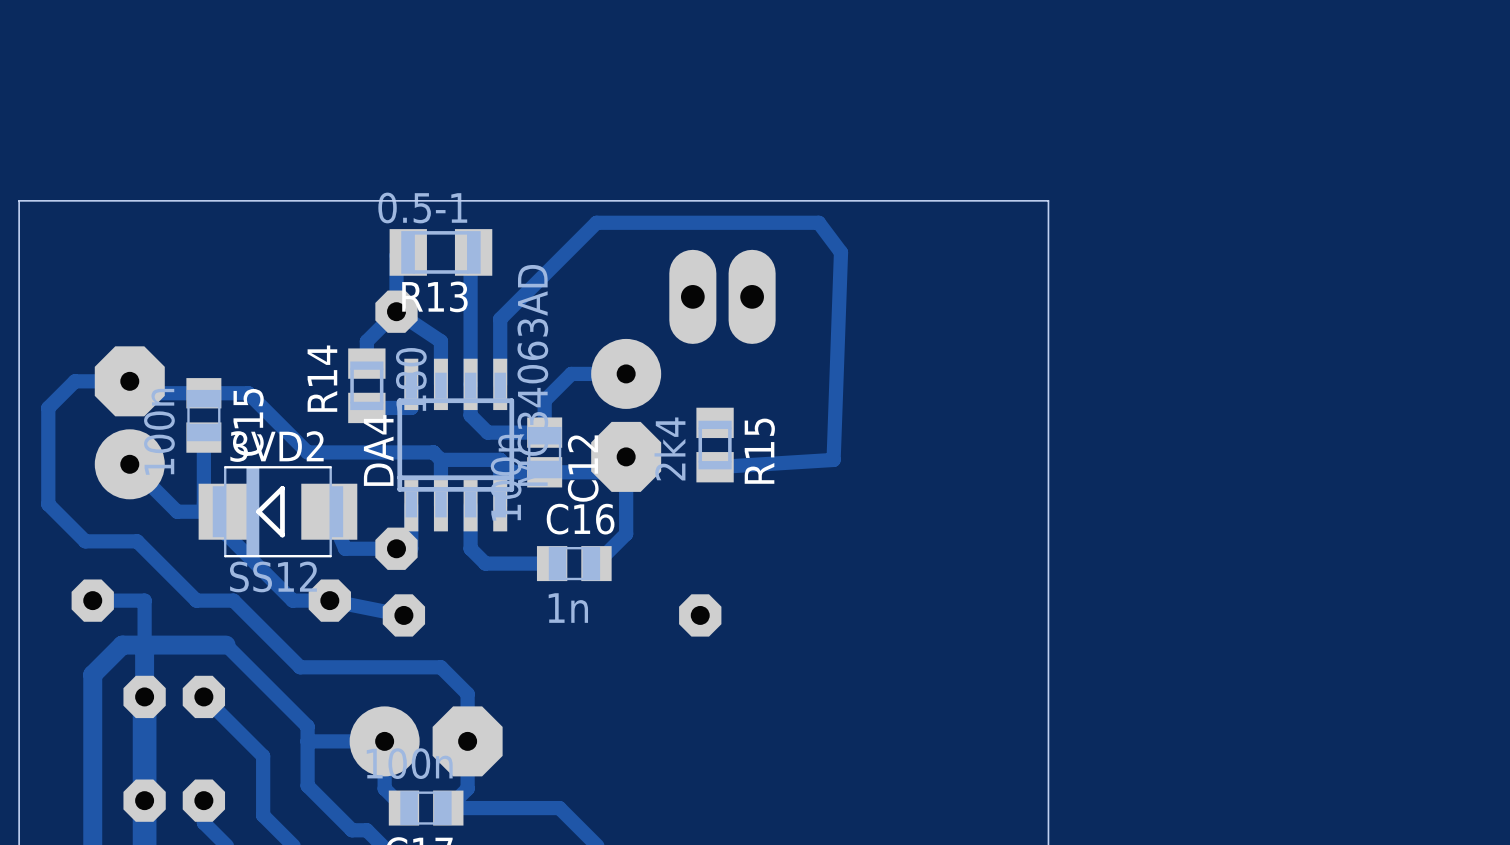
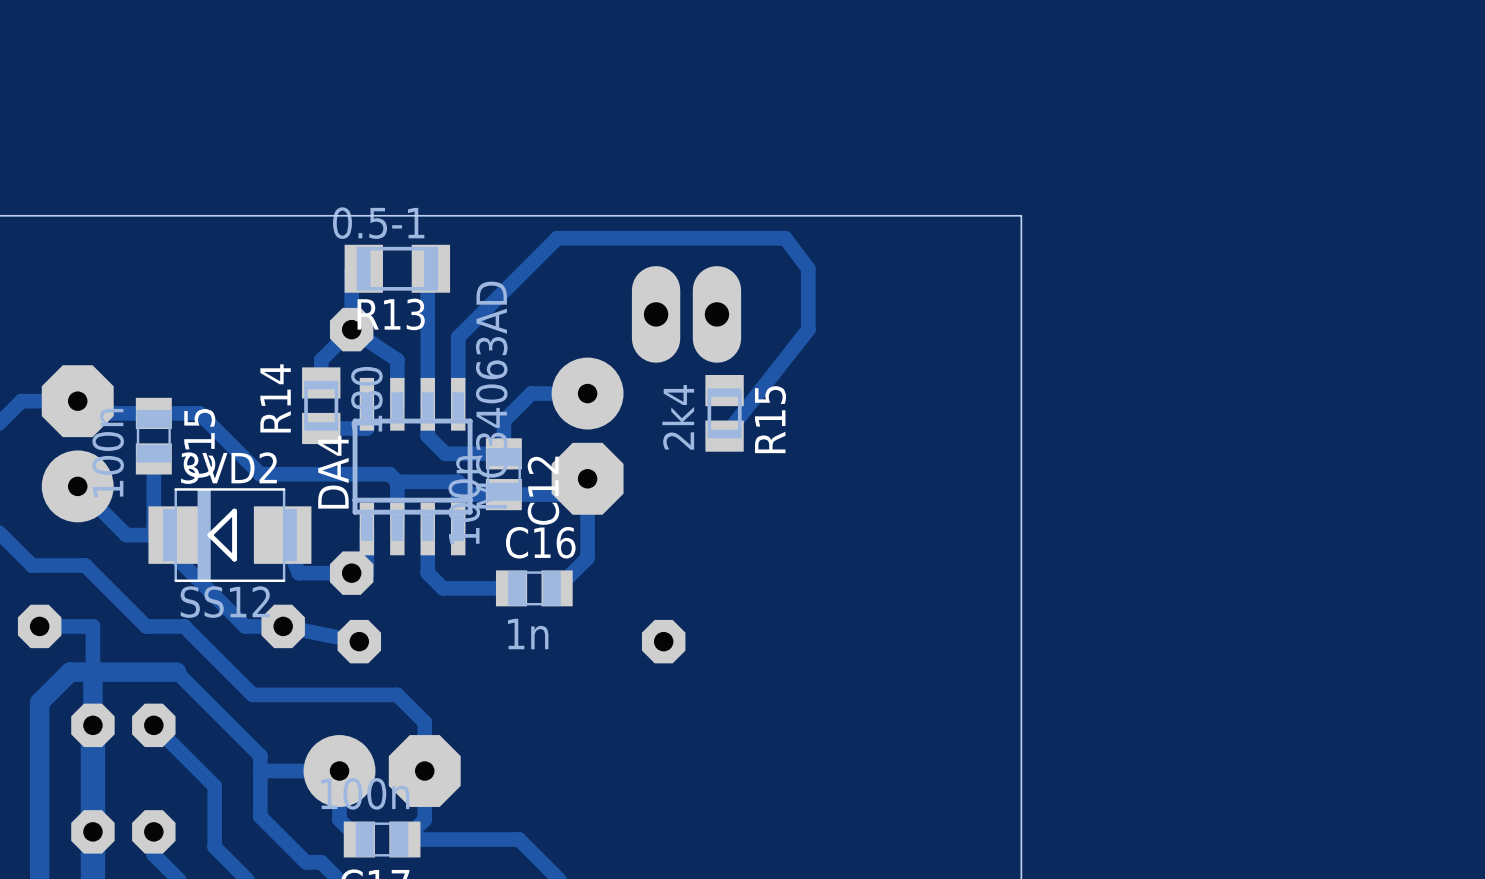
track: (841, 252) (833, 459) (715, 467) -> (808, 268) (808, 329) (724, 436)
R15 position: (715, 445) -> (724, 413)

